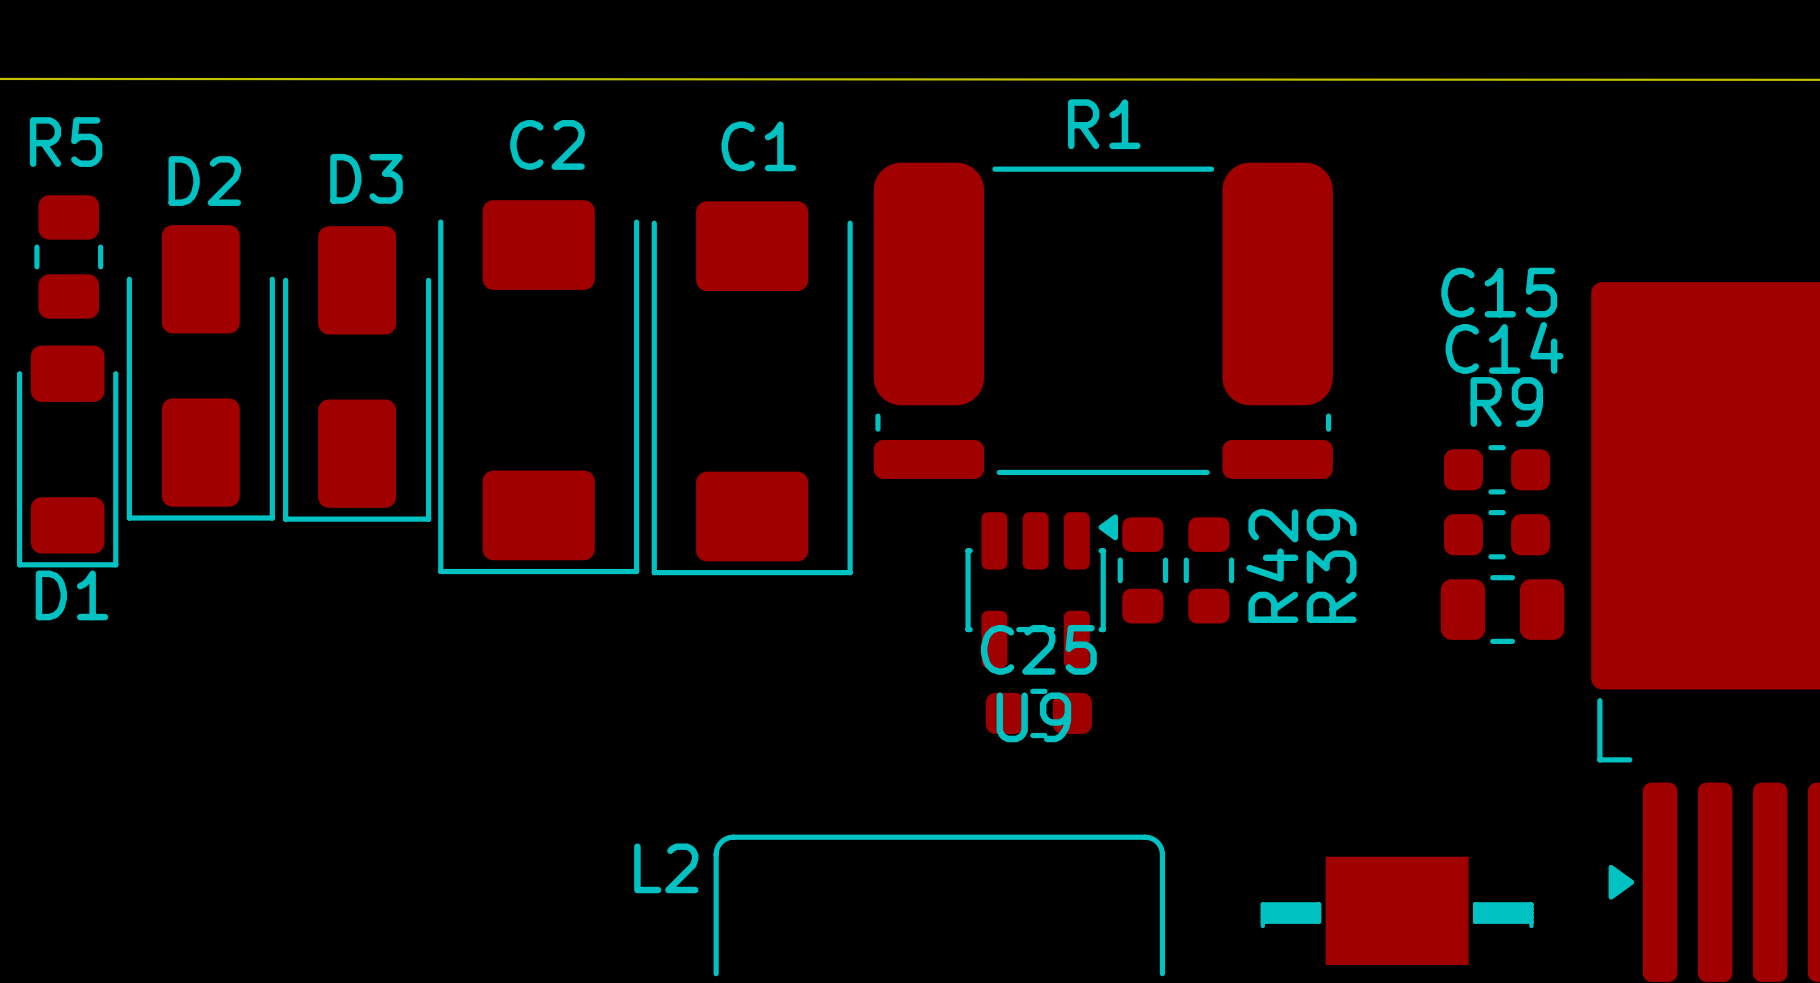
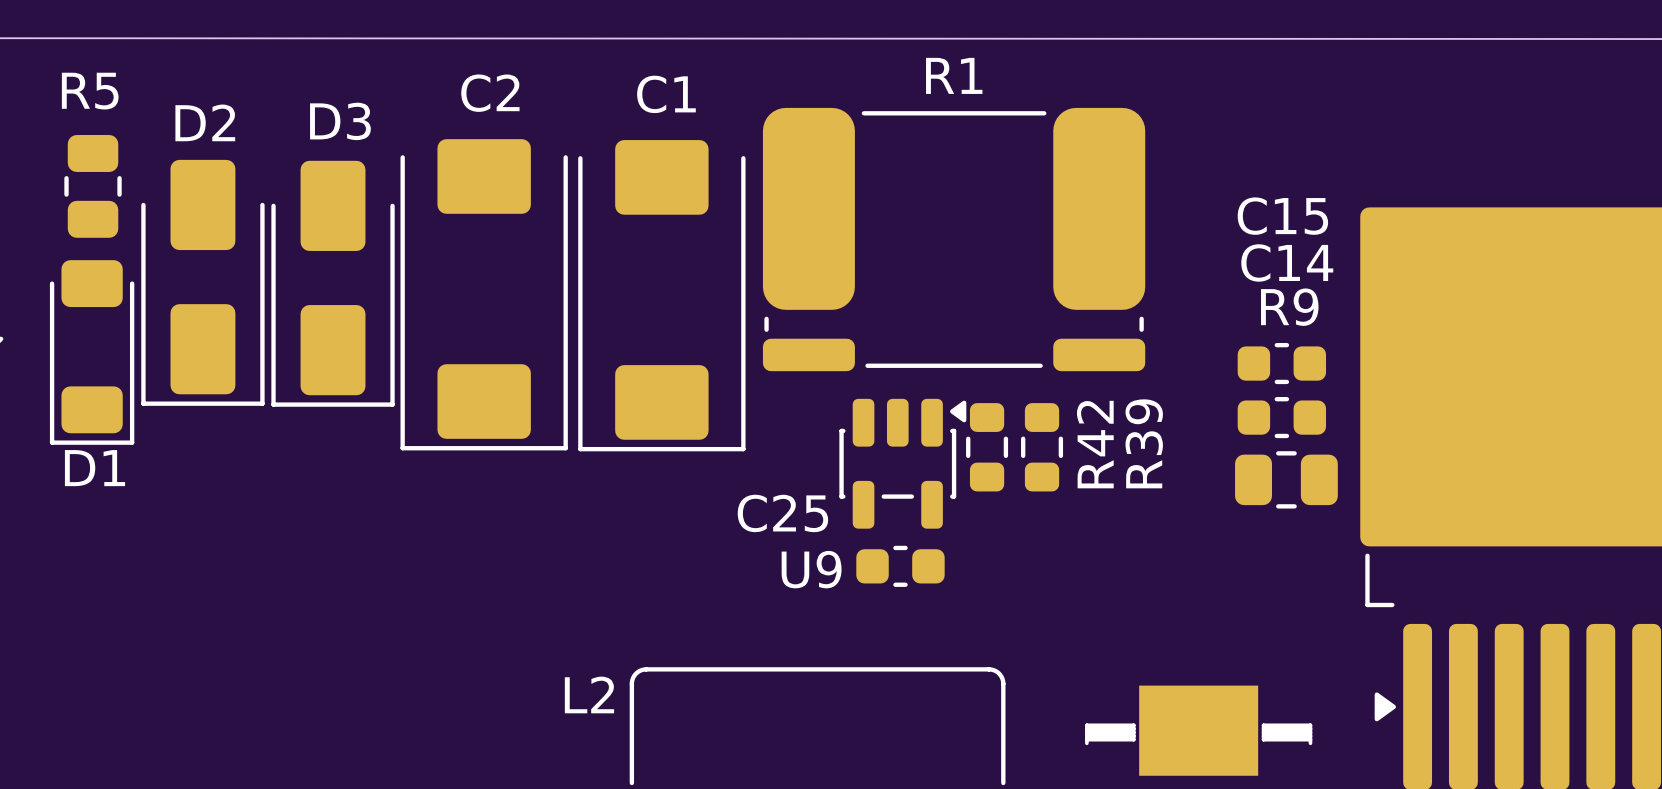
C25 name position: C25 (1038, 649) -> C25 (782, 513)
U9 name position: U9 (1033, 717) -> U9 (811, 569)

